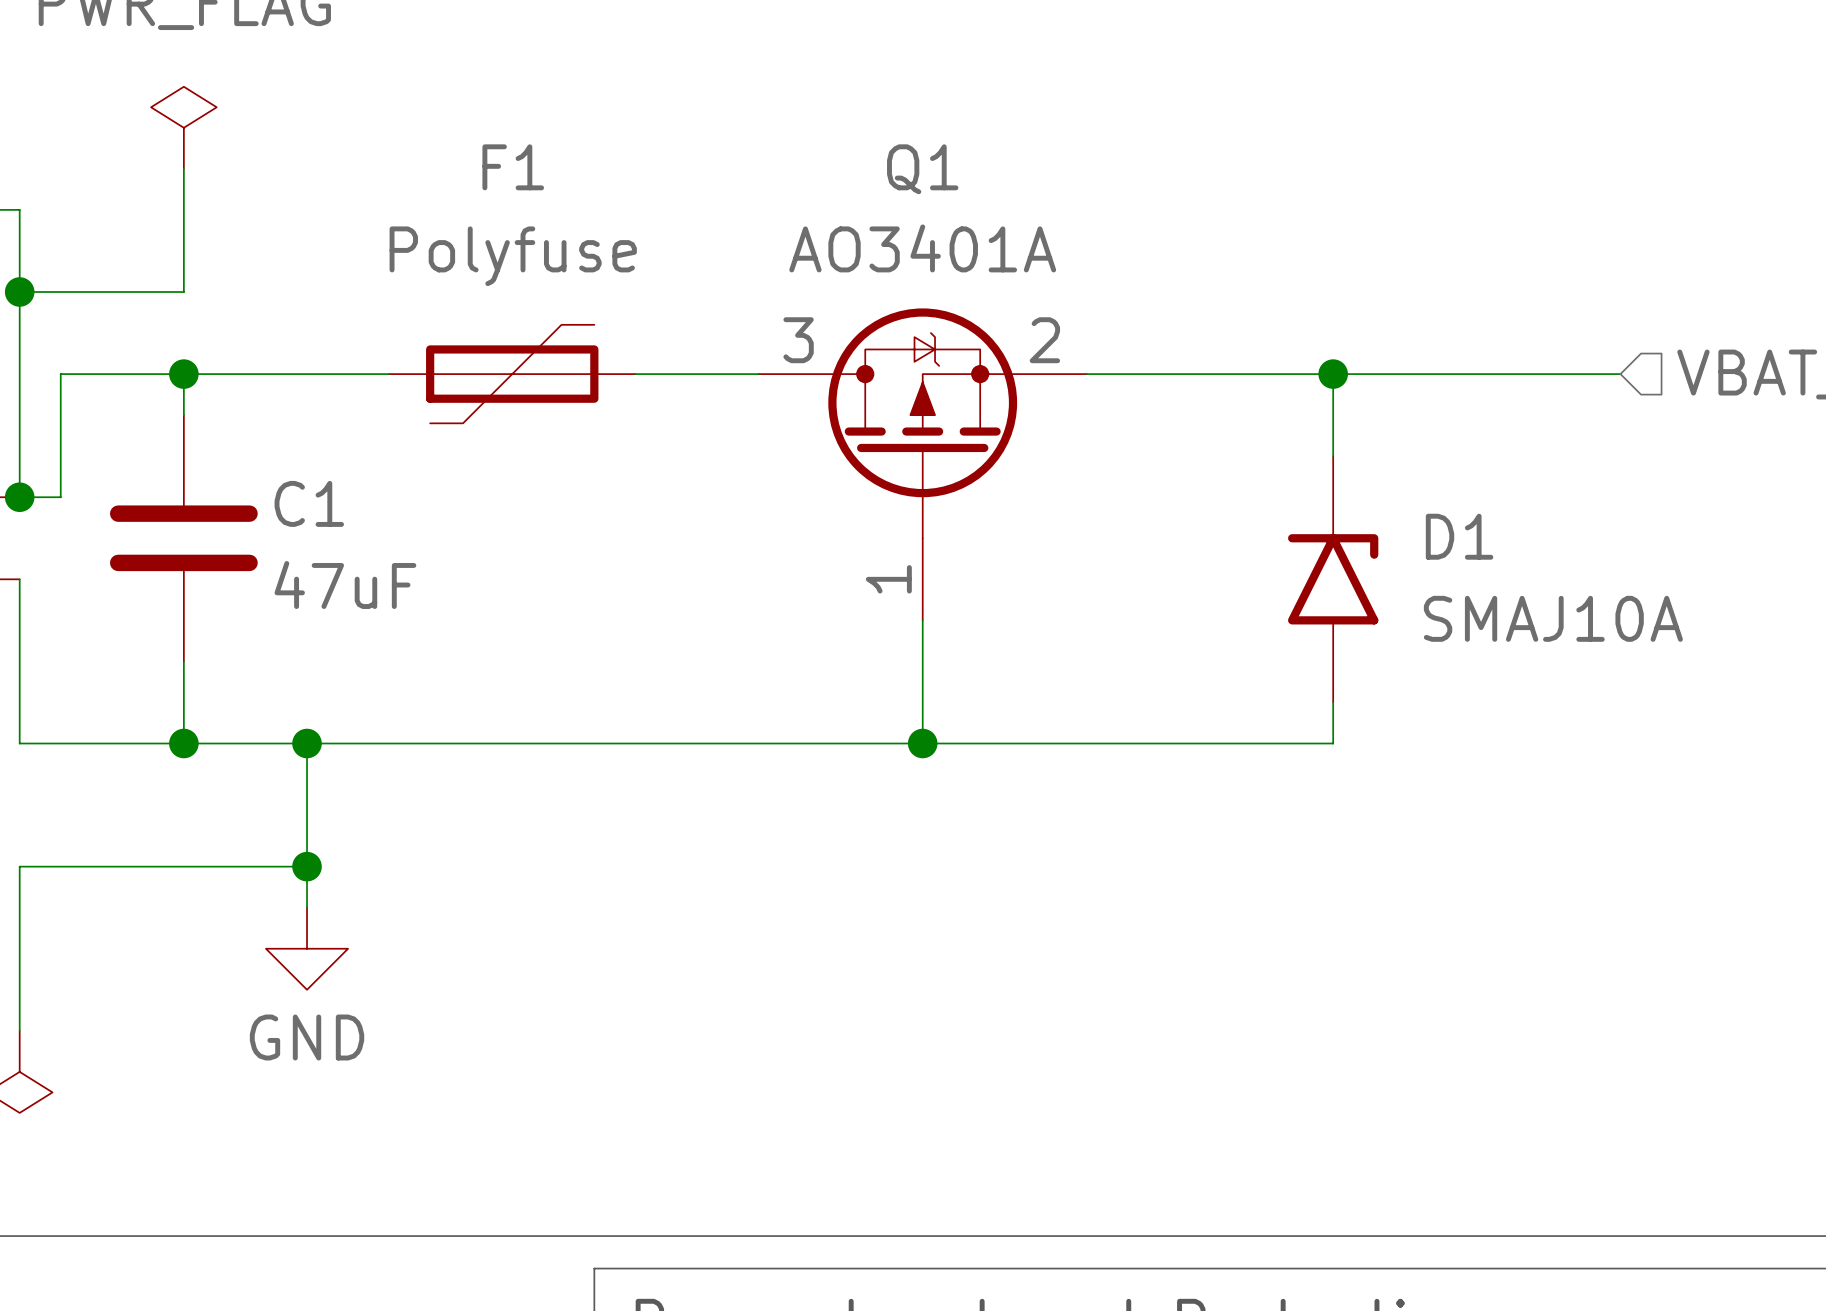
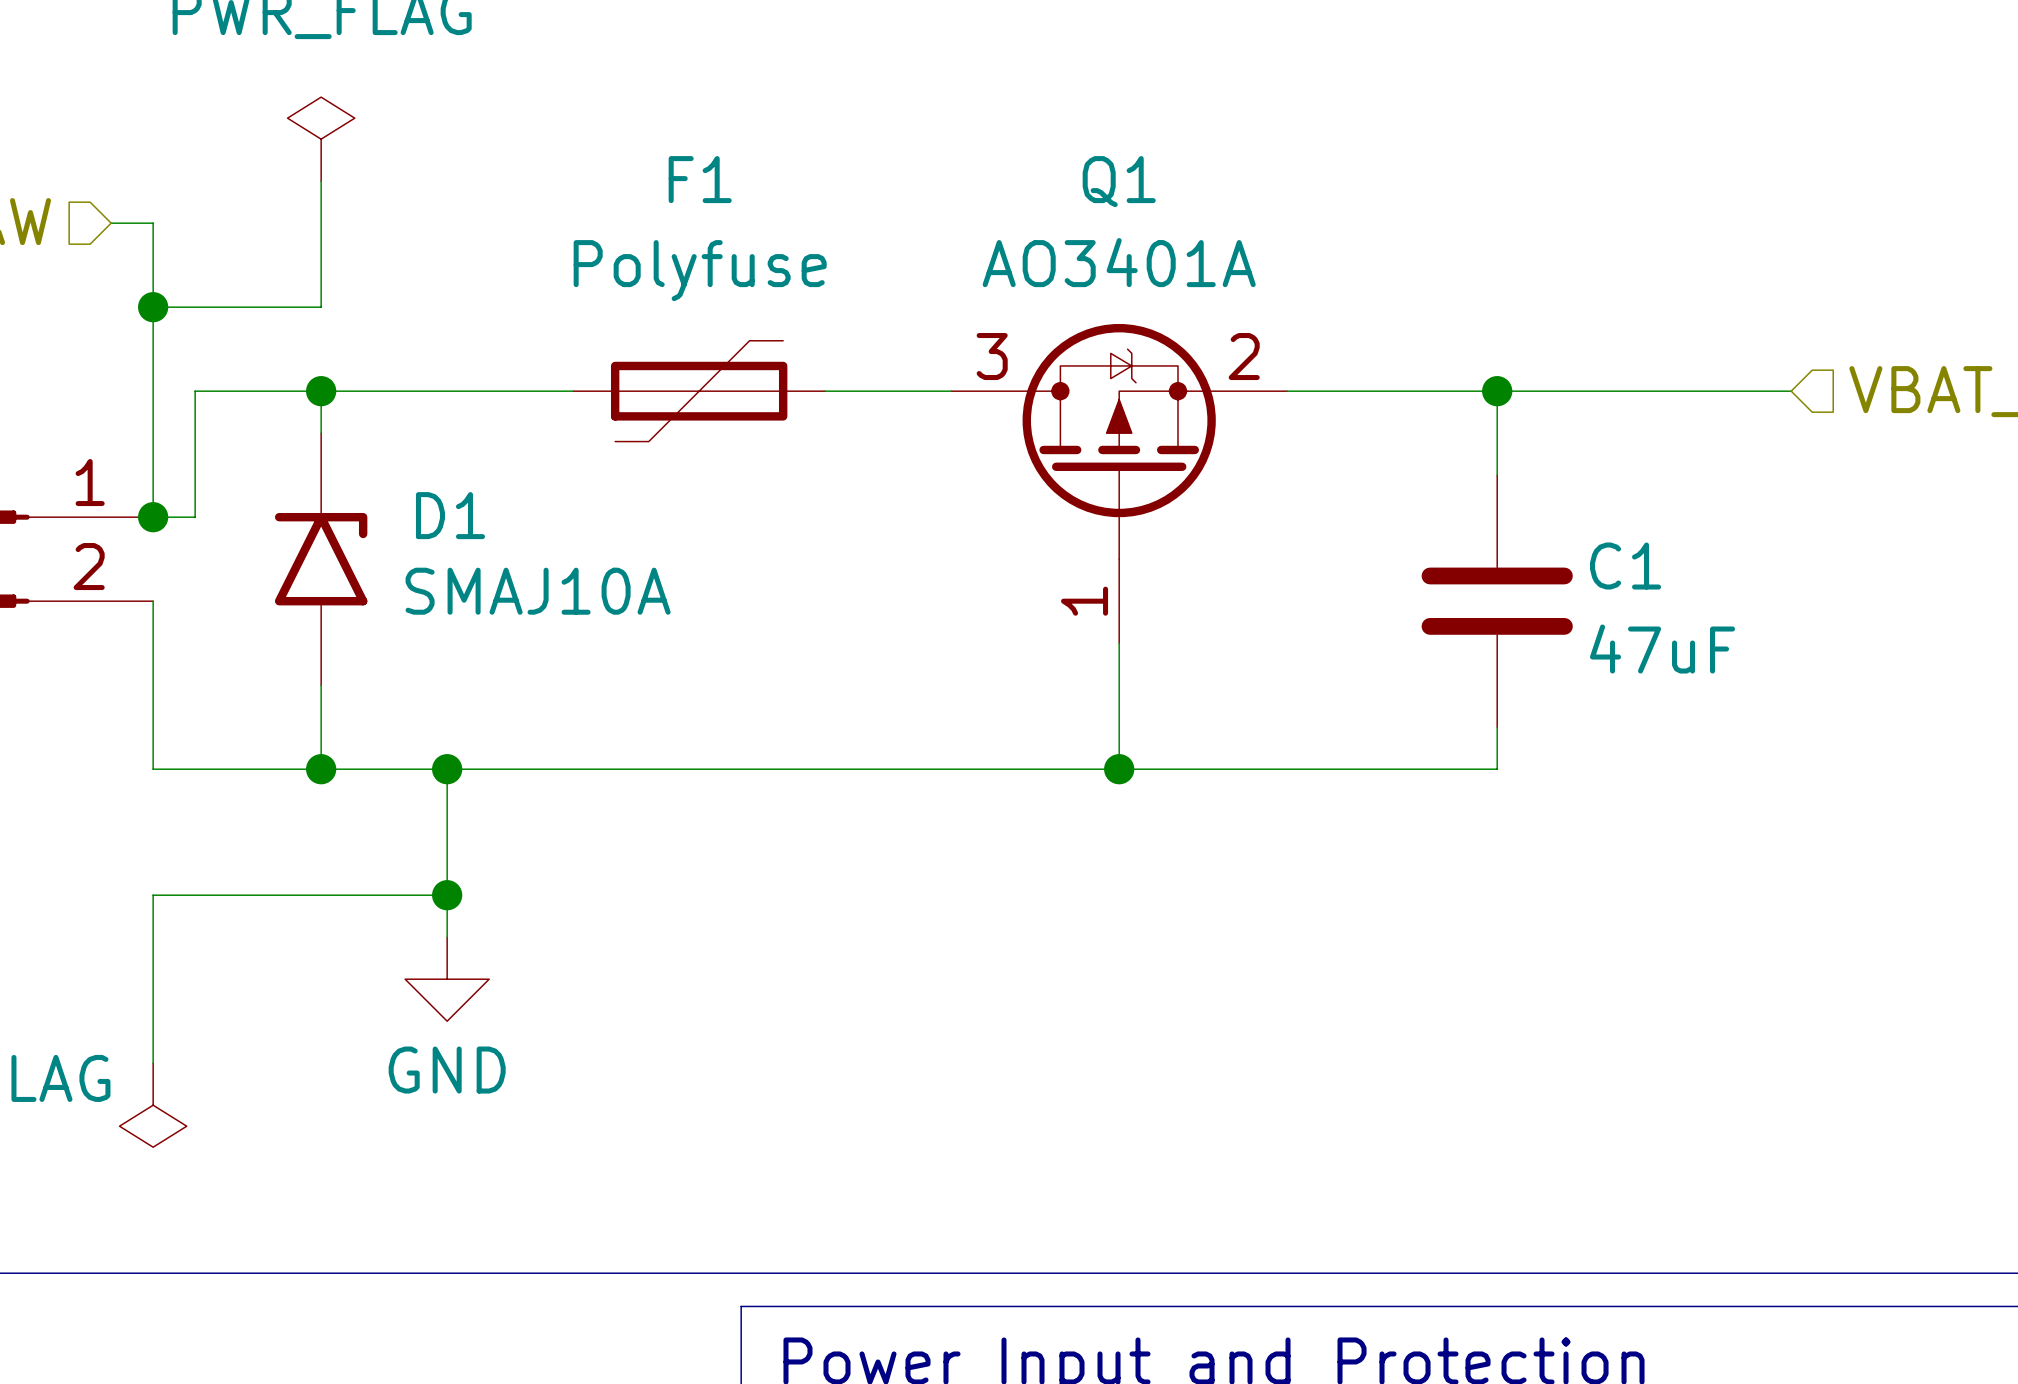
F1 position: (512, 374) -> (699, 391)
Q1 position: (922, 464) -> (1119, 483)
C1 position: (183, 538) -> (1497, 601)
D1 position: (1333, 579) -> (321, 559)
D1 value position: SMAJ10A (1553, 618) -> SMAJ10A (538, 591)
wire: (922, 620) (922, 743) -> (1119, 643) (1119, 769)
junction position: (922, 743) -> (1119, 769)

